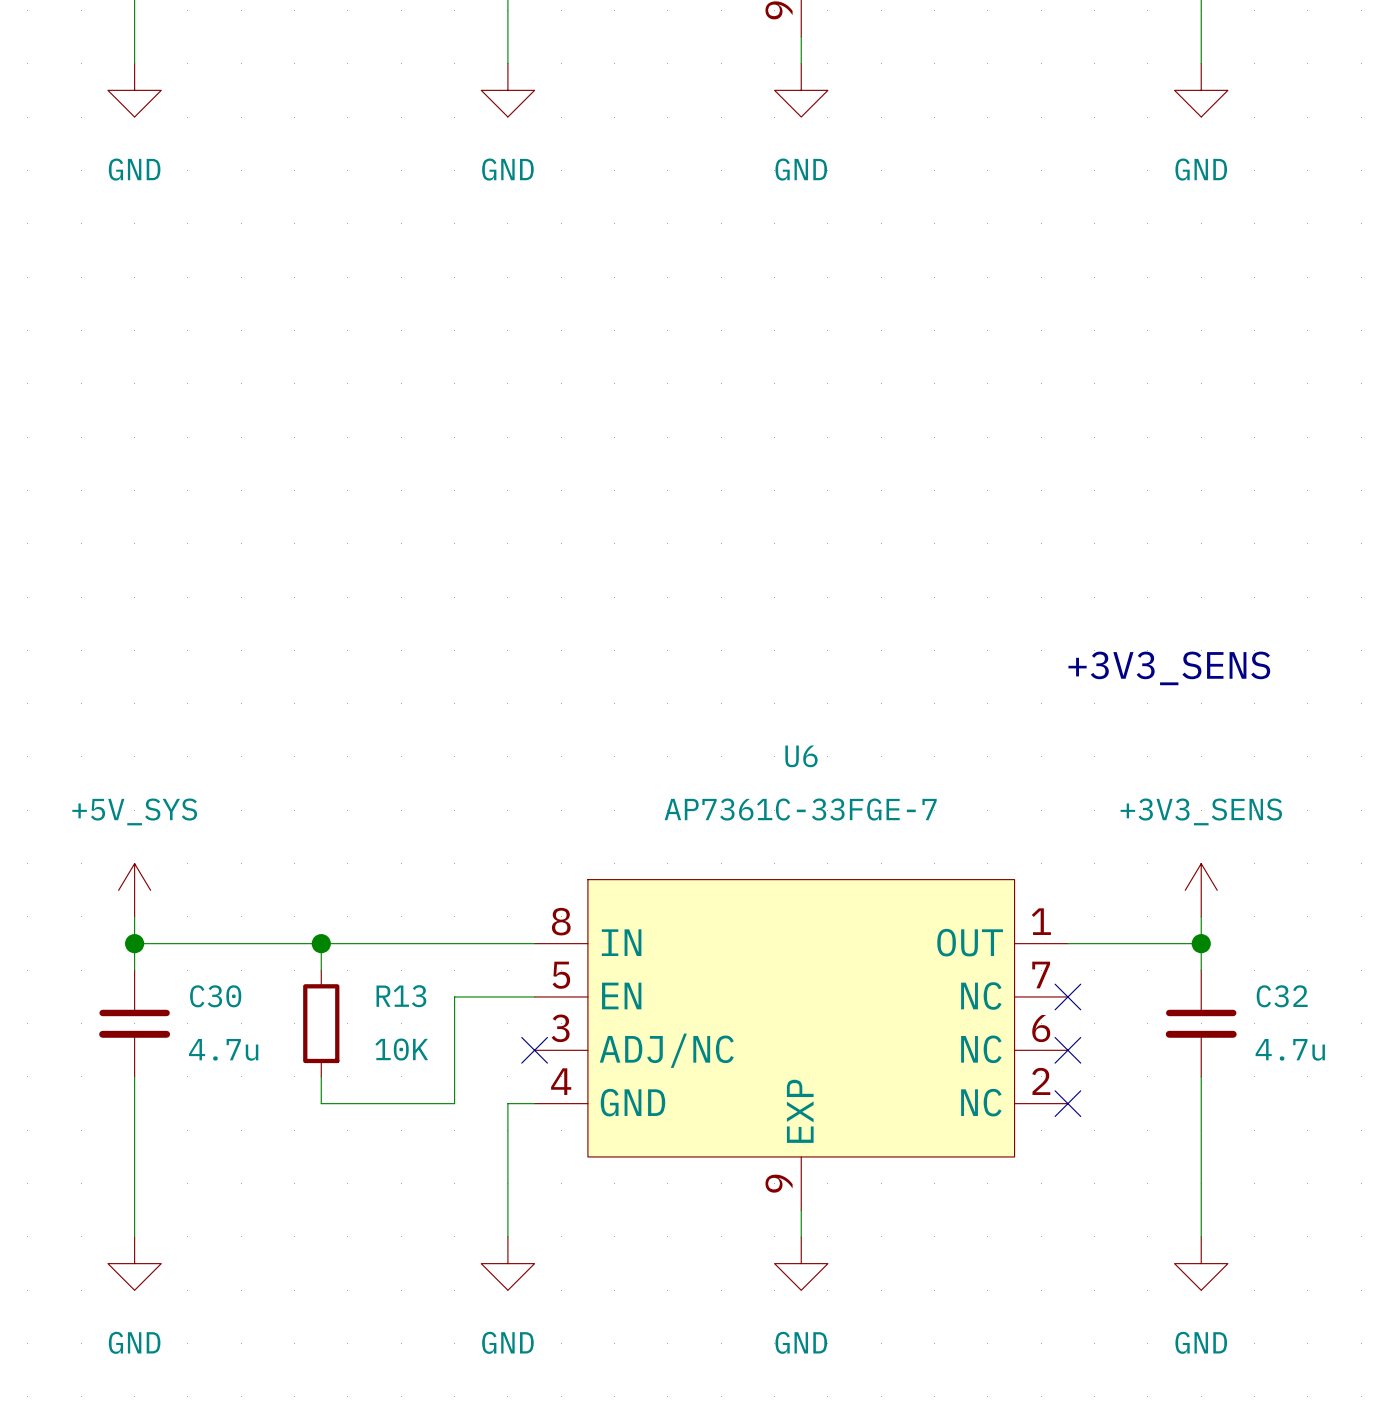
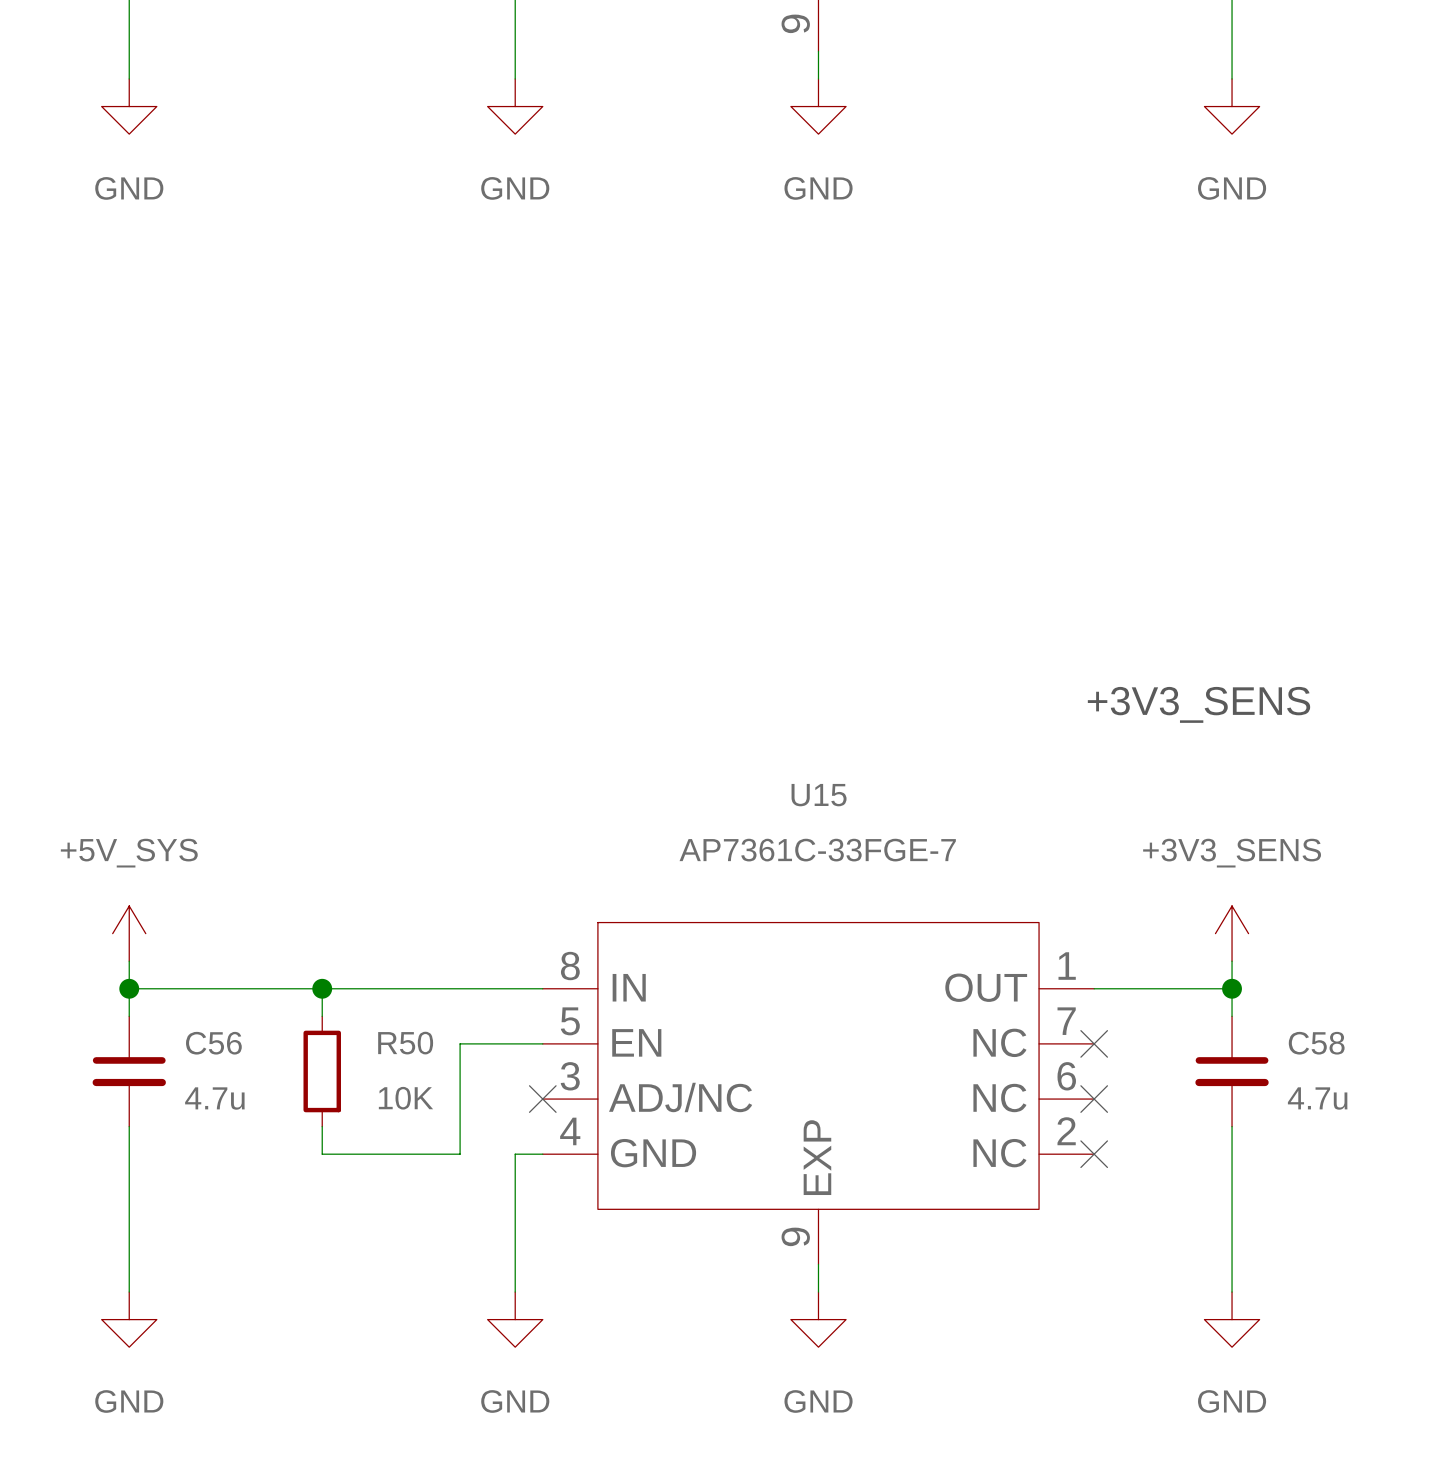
U6 name: U6 (801, 756) -> U15 (819, 795)
C30 name: C30 (215, 996) -> C56 (213, 1043)
R13 name: R13 (401, 996) -> R50 (405, 1043)
C32 name: C32 (1282, 996) -> C58 (1316, 1043)

